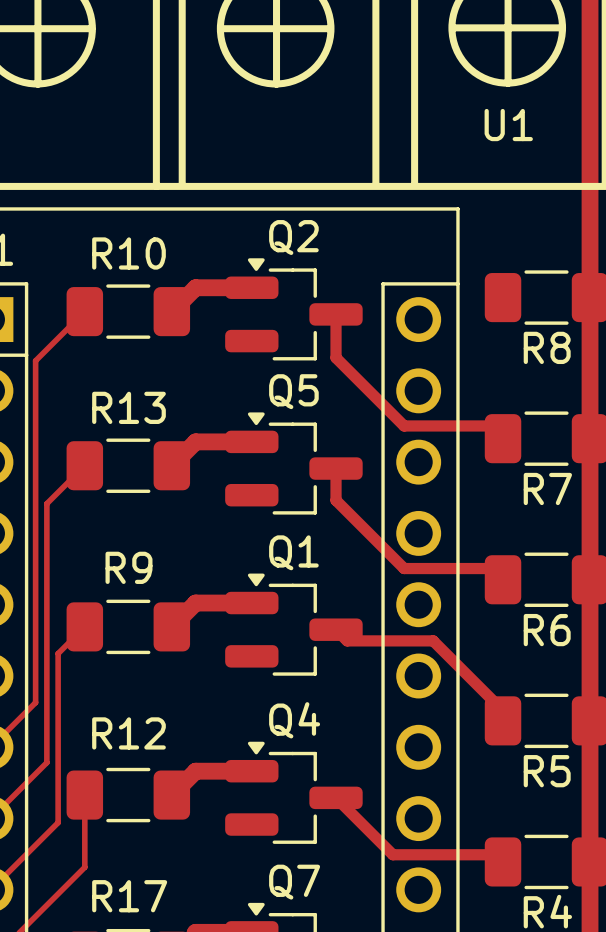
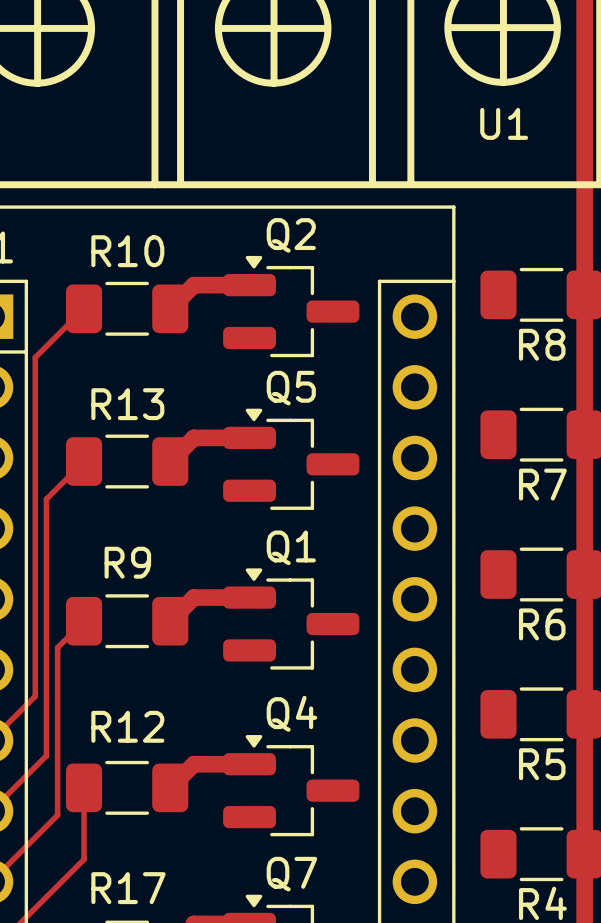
track: (336, 314) (336, 357) (404, 425) (490, 425) (503, 438) -> none
track: (336, 468) (336, 500) (404, 568) (491, 568) (503, 579) -> none
track: (336, 629) (347, 640) (433, 640) (503, 710) (503, 720) -> none
track: (336, 797) (392, 854) (495, 854) (503, 861) -> none

